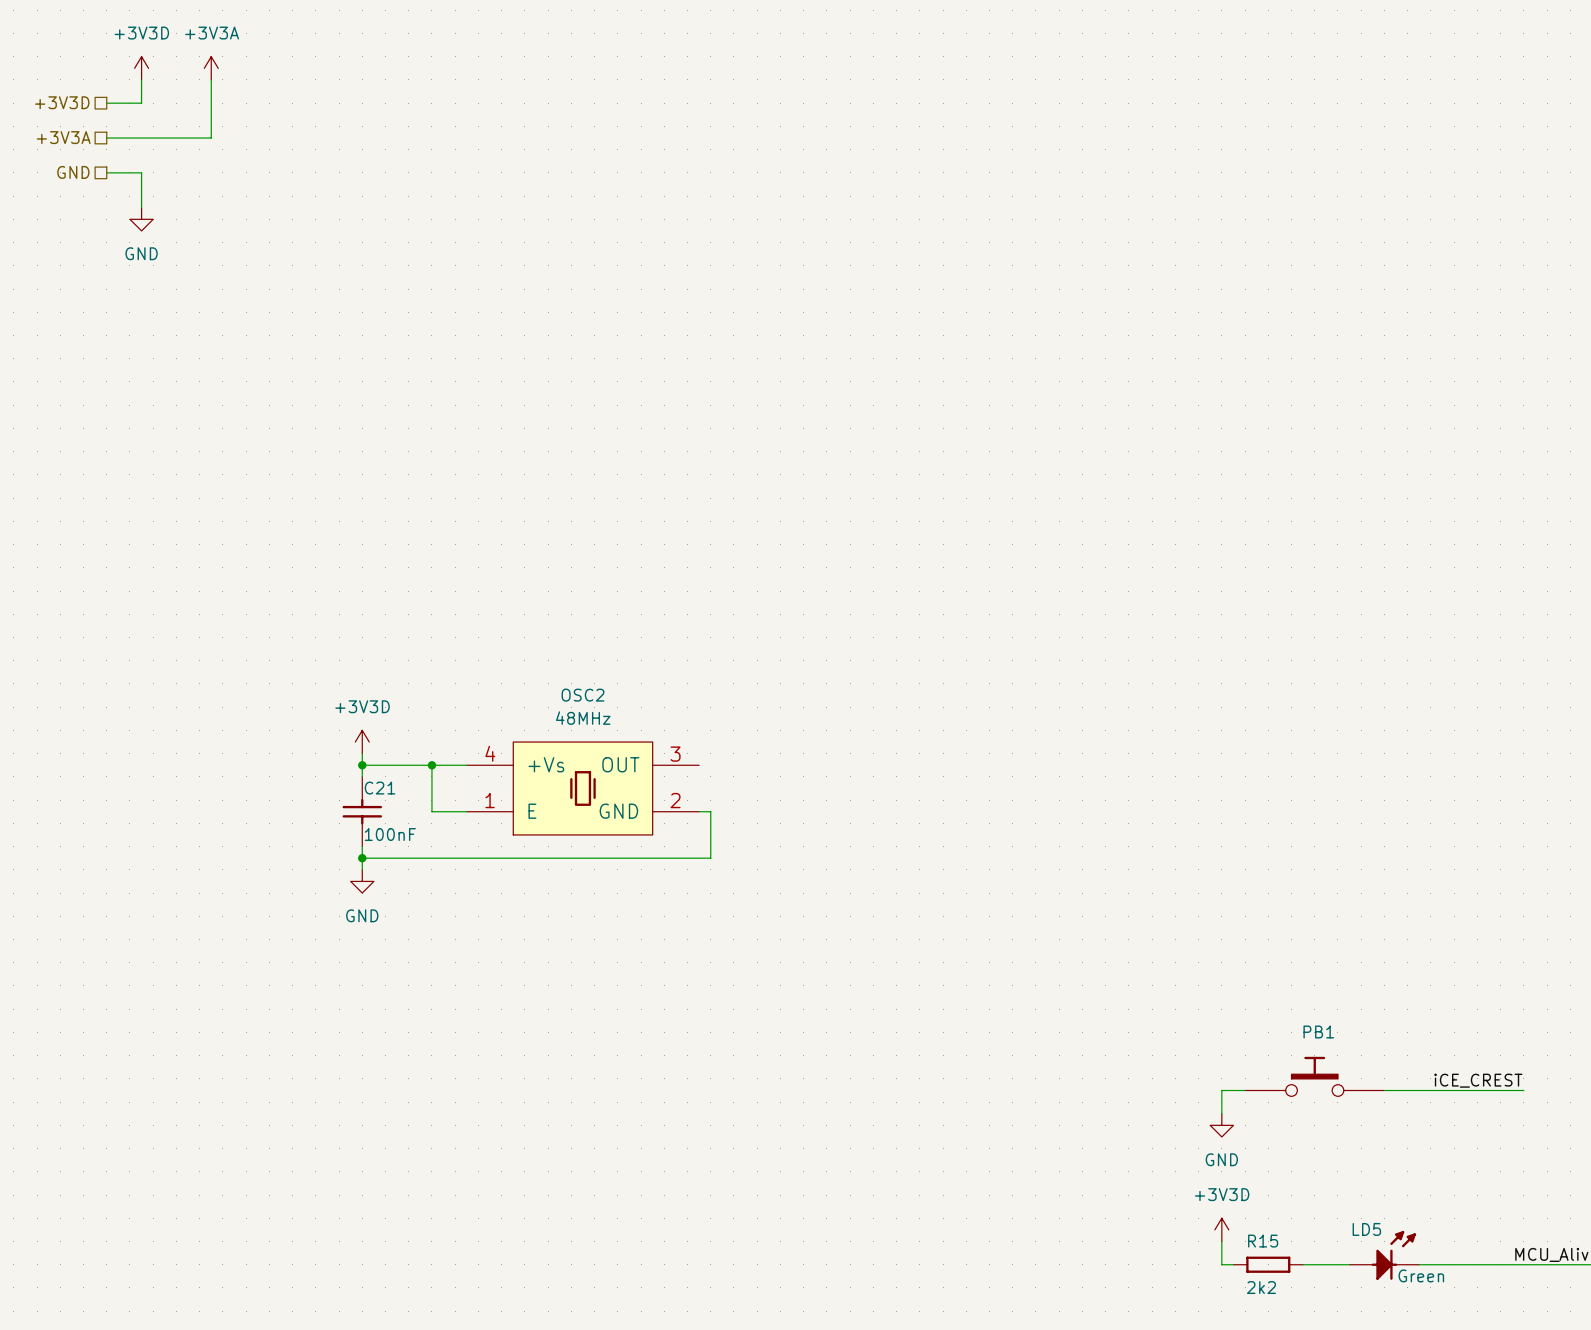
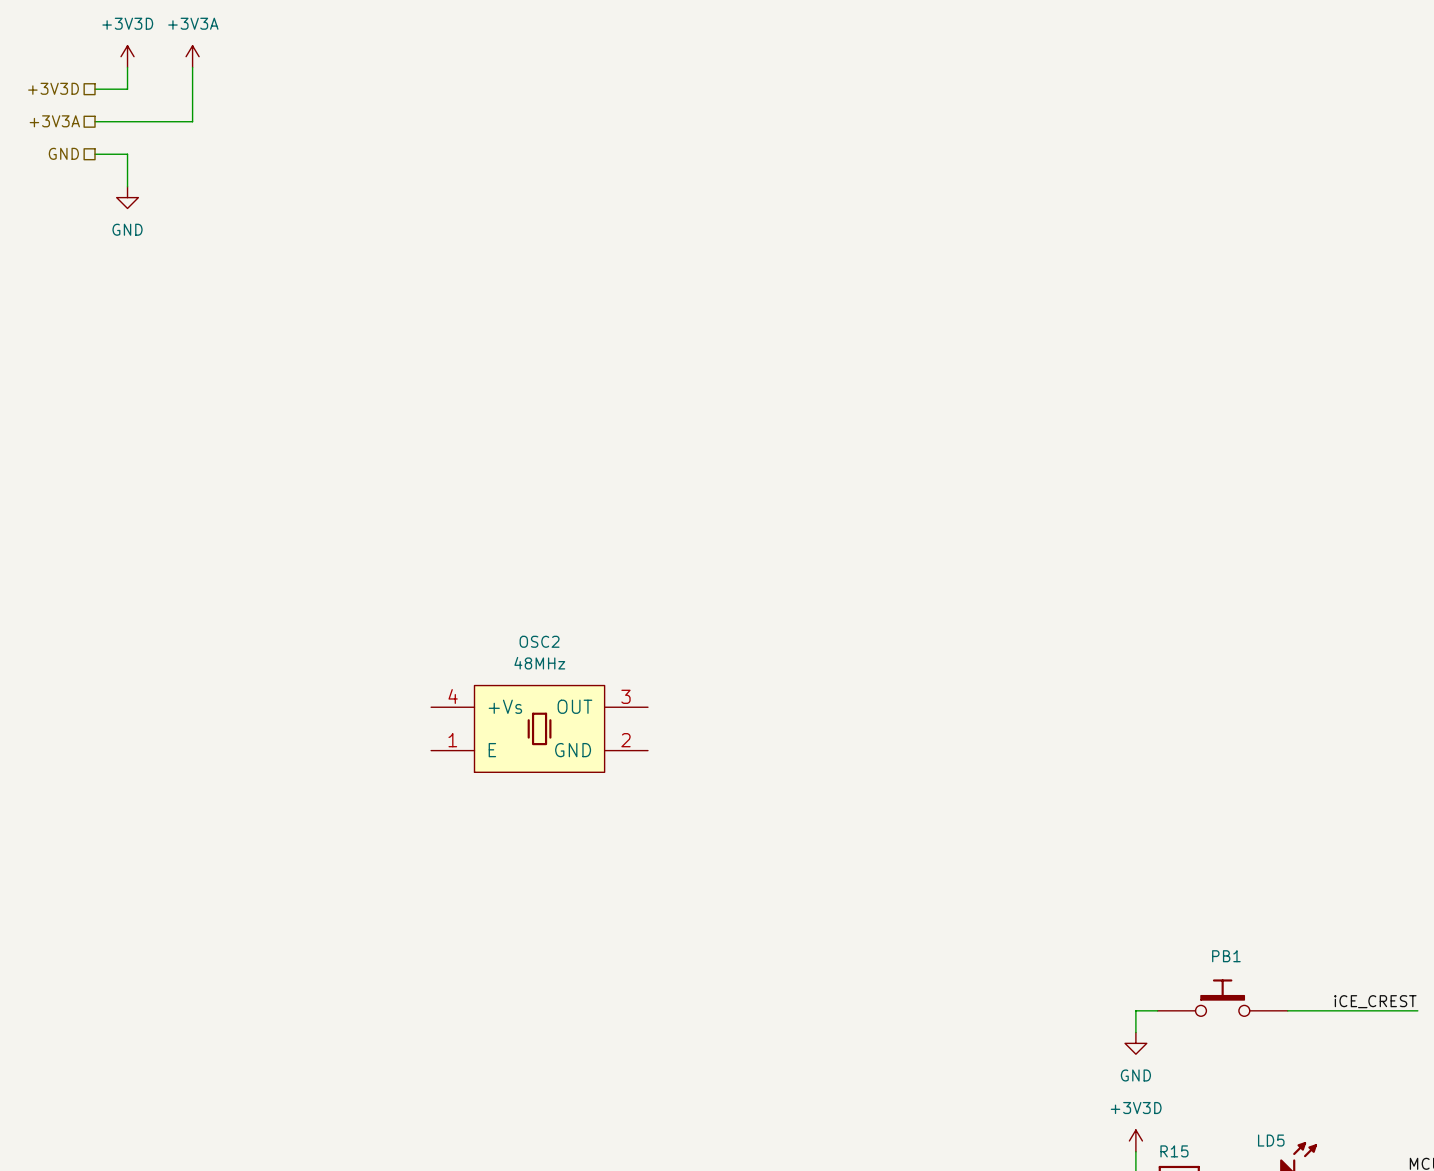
power symbol: +3V3D (362, 742) -> none
wire: (362, 753) (362, 776) -> none
wire: (362, 765) (466, 765) -> none
junction: (362, 765) -> none
wire: (431, 765) (431, 811) (466, 811) -> none
junction: (431, 765) -> none
C21: (362, 811) -> none
wire: (699, 811) (710, 811) (710, 858) (362, 858) -> none
wire: (362, 846) (362, 869) -> none
junction: (362, 858) -> none
power symbol: GND (362, 881) -> none

